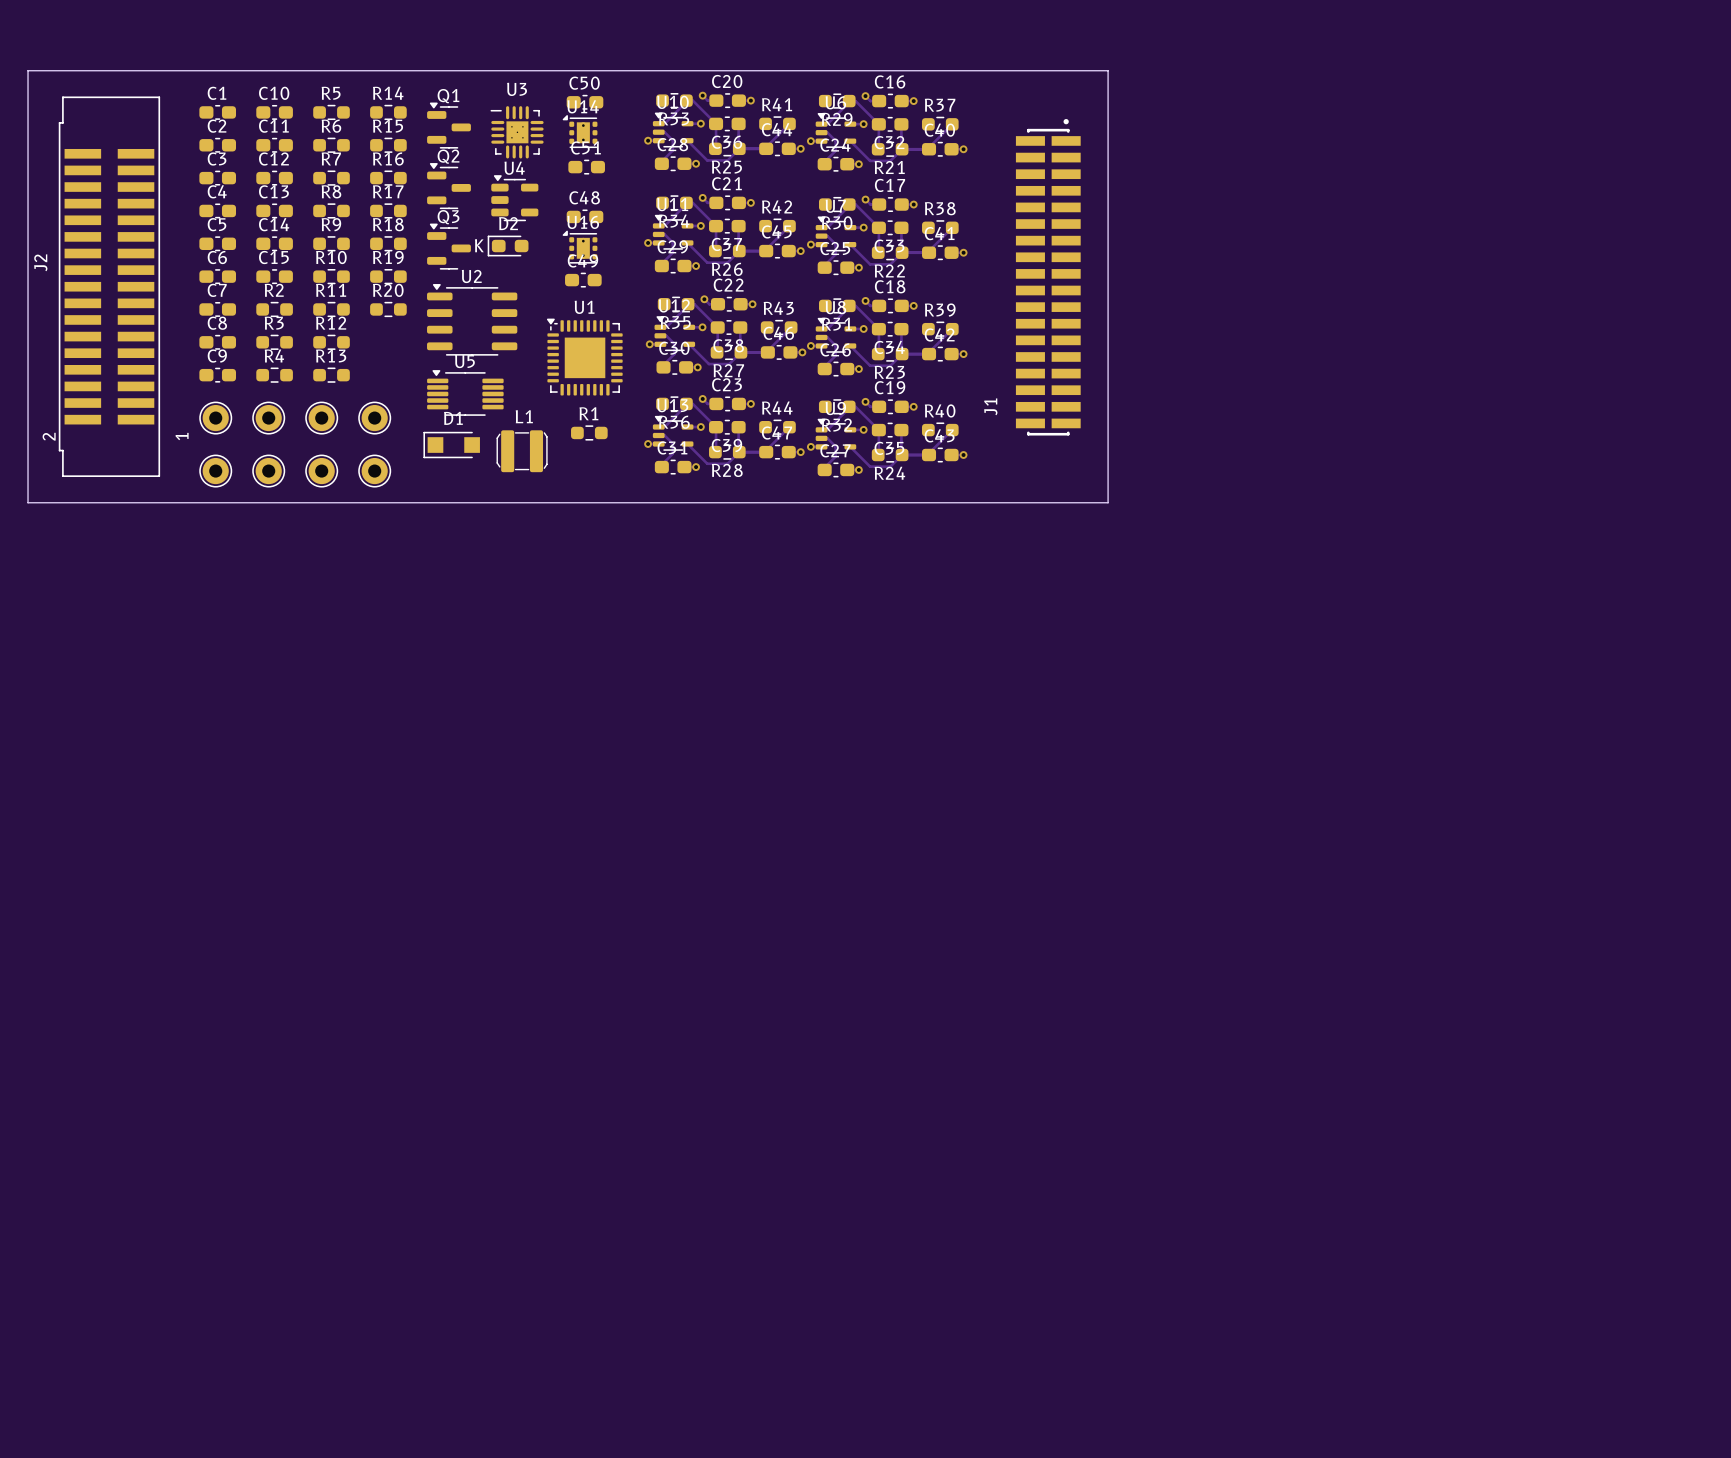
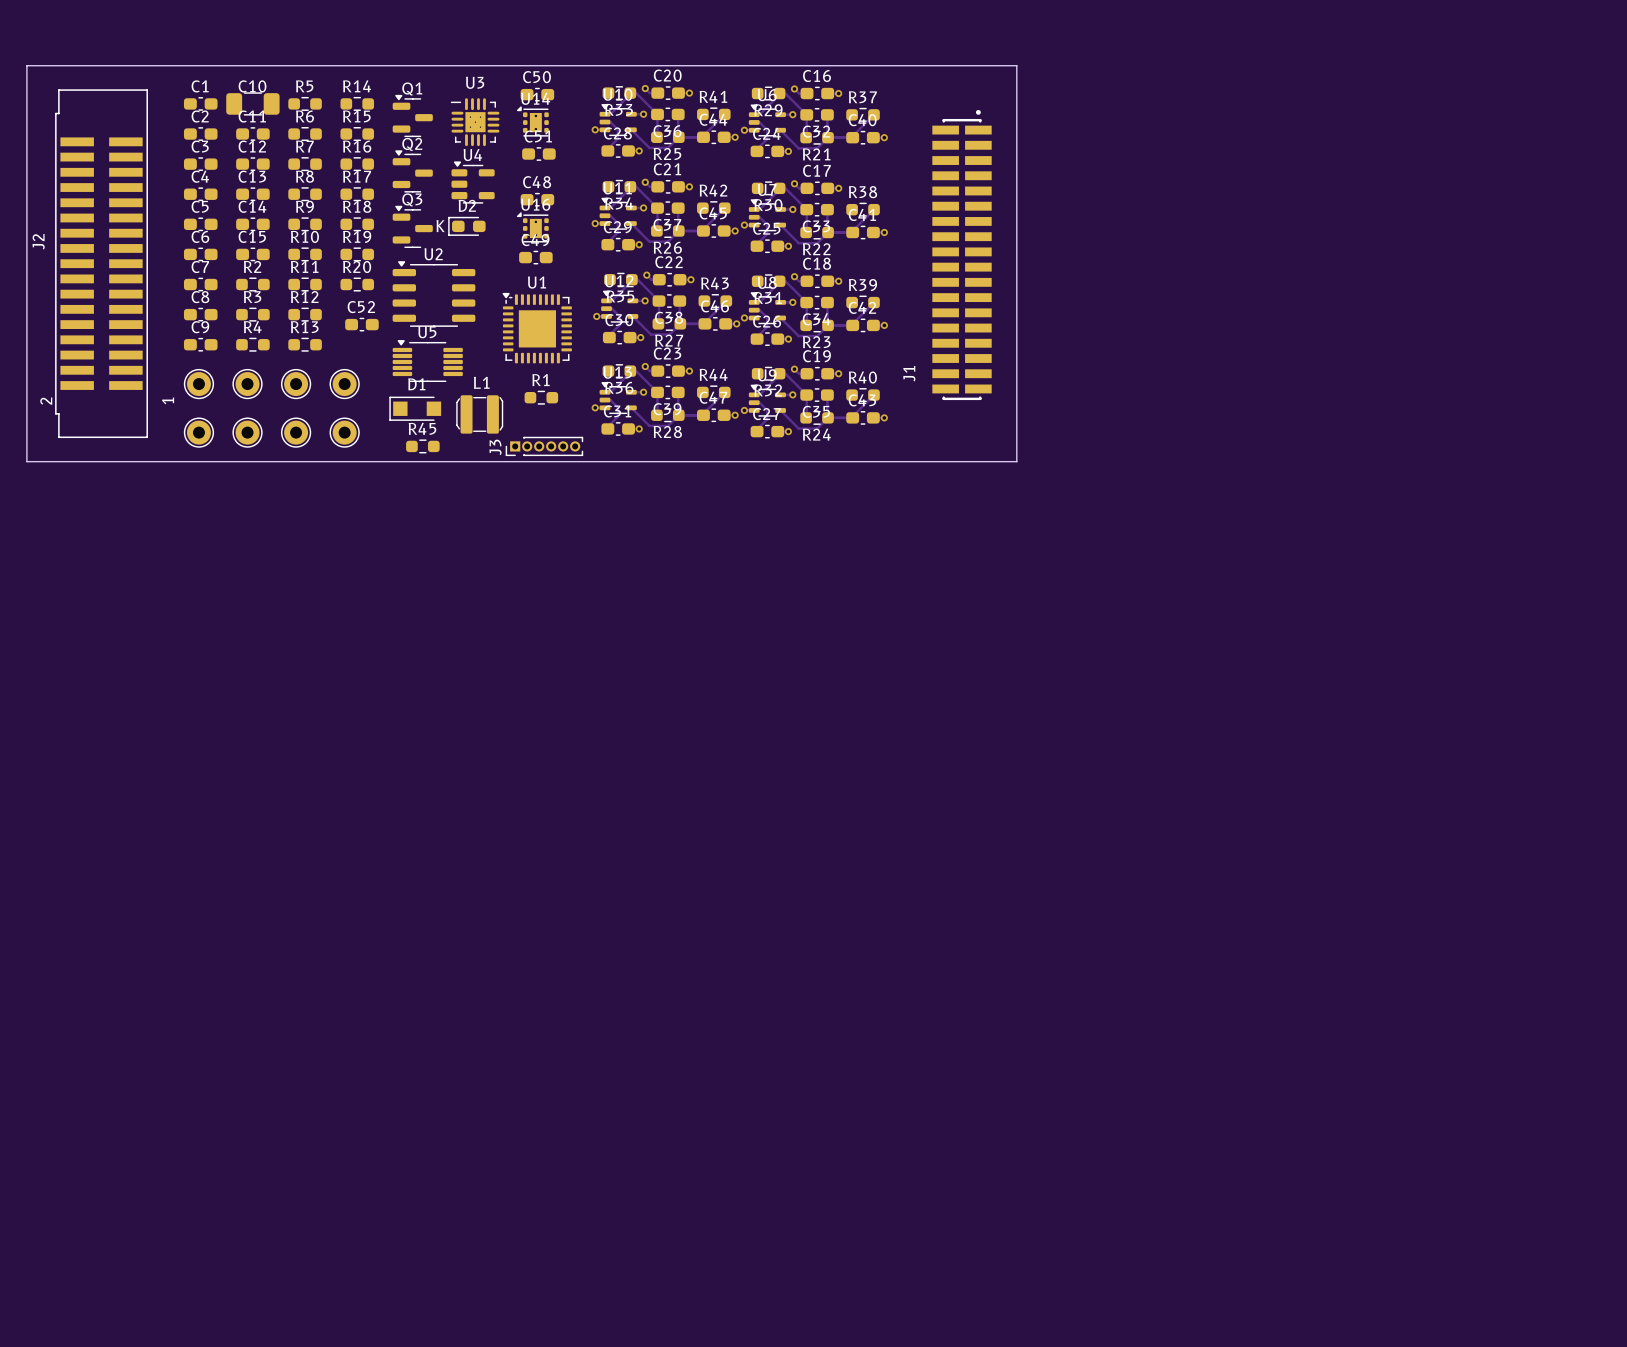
C10 footprint: [256, 104, 293, 120] -> [226, 92, 280, 116]
C52: none -> (361, 324)
R45: none -> (422, 446)
J3: none -> (544, 446)

